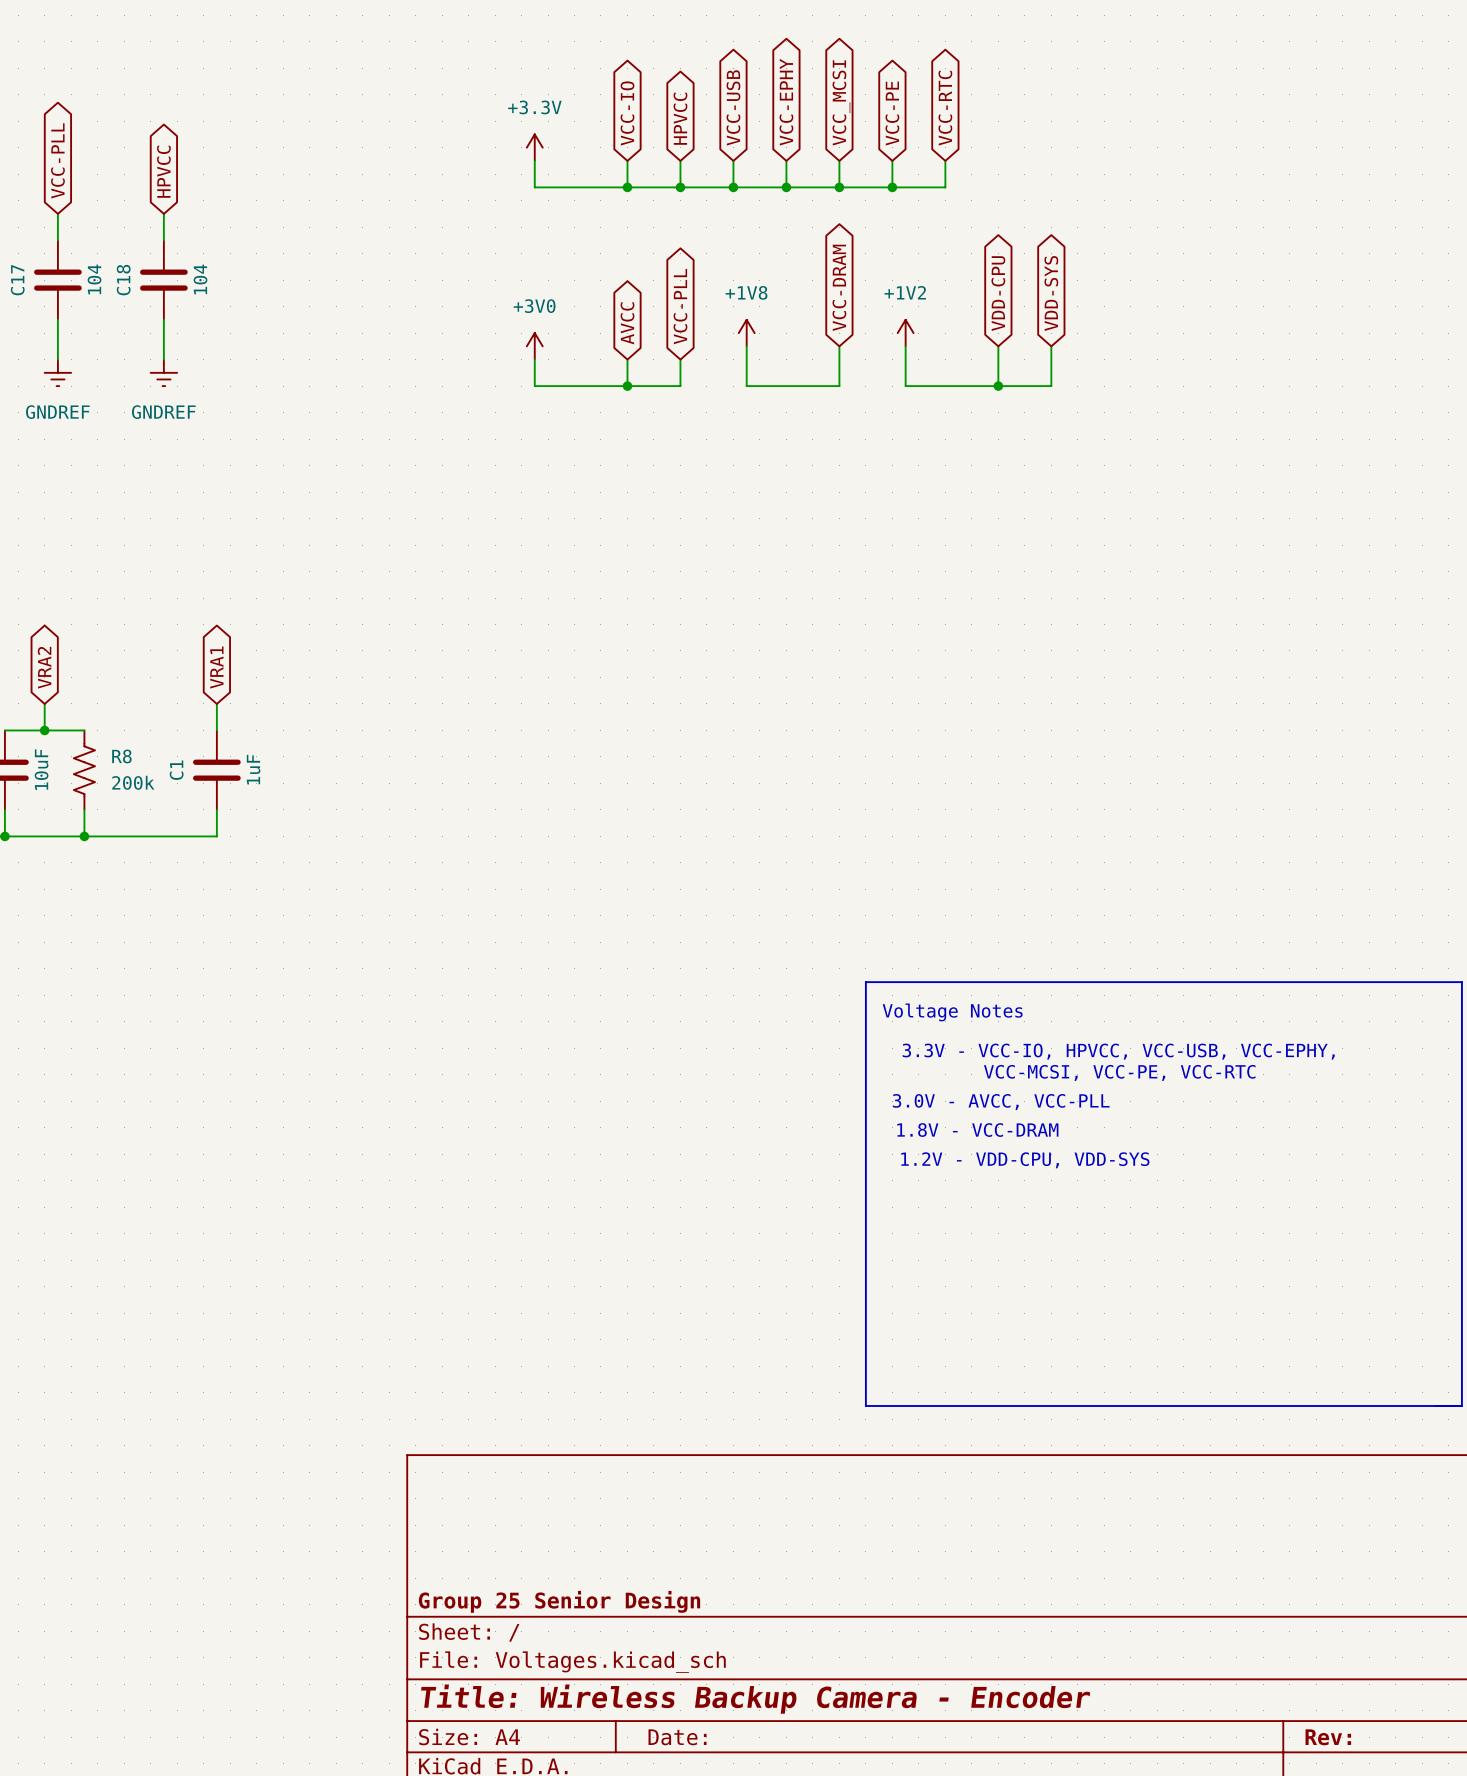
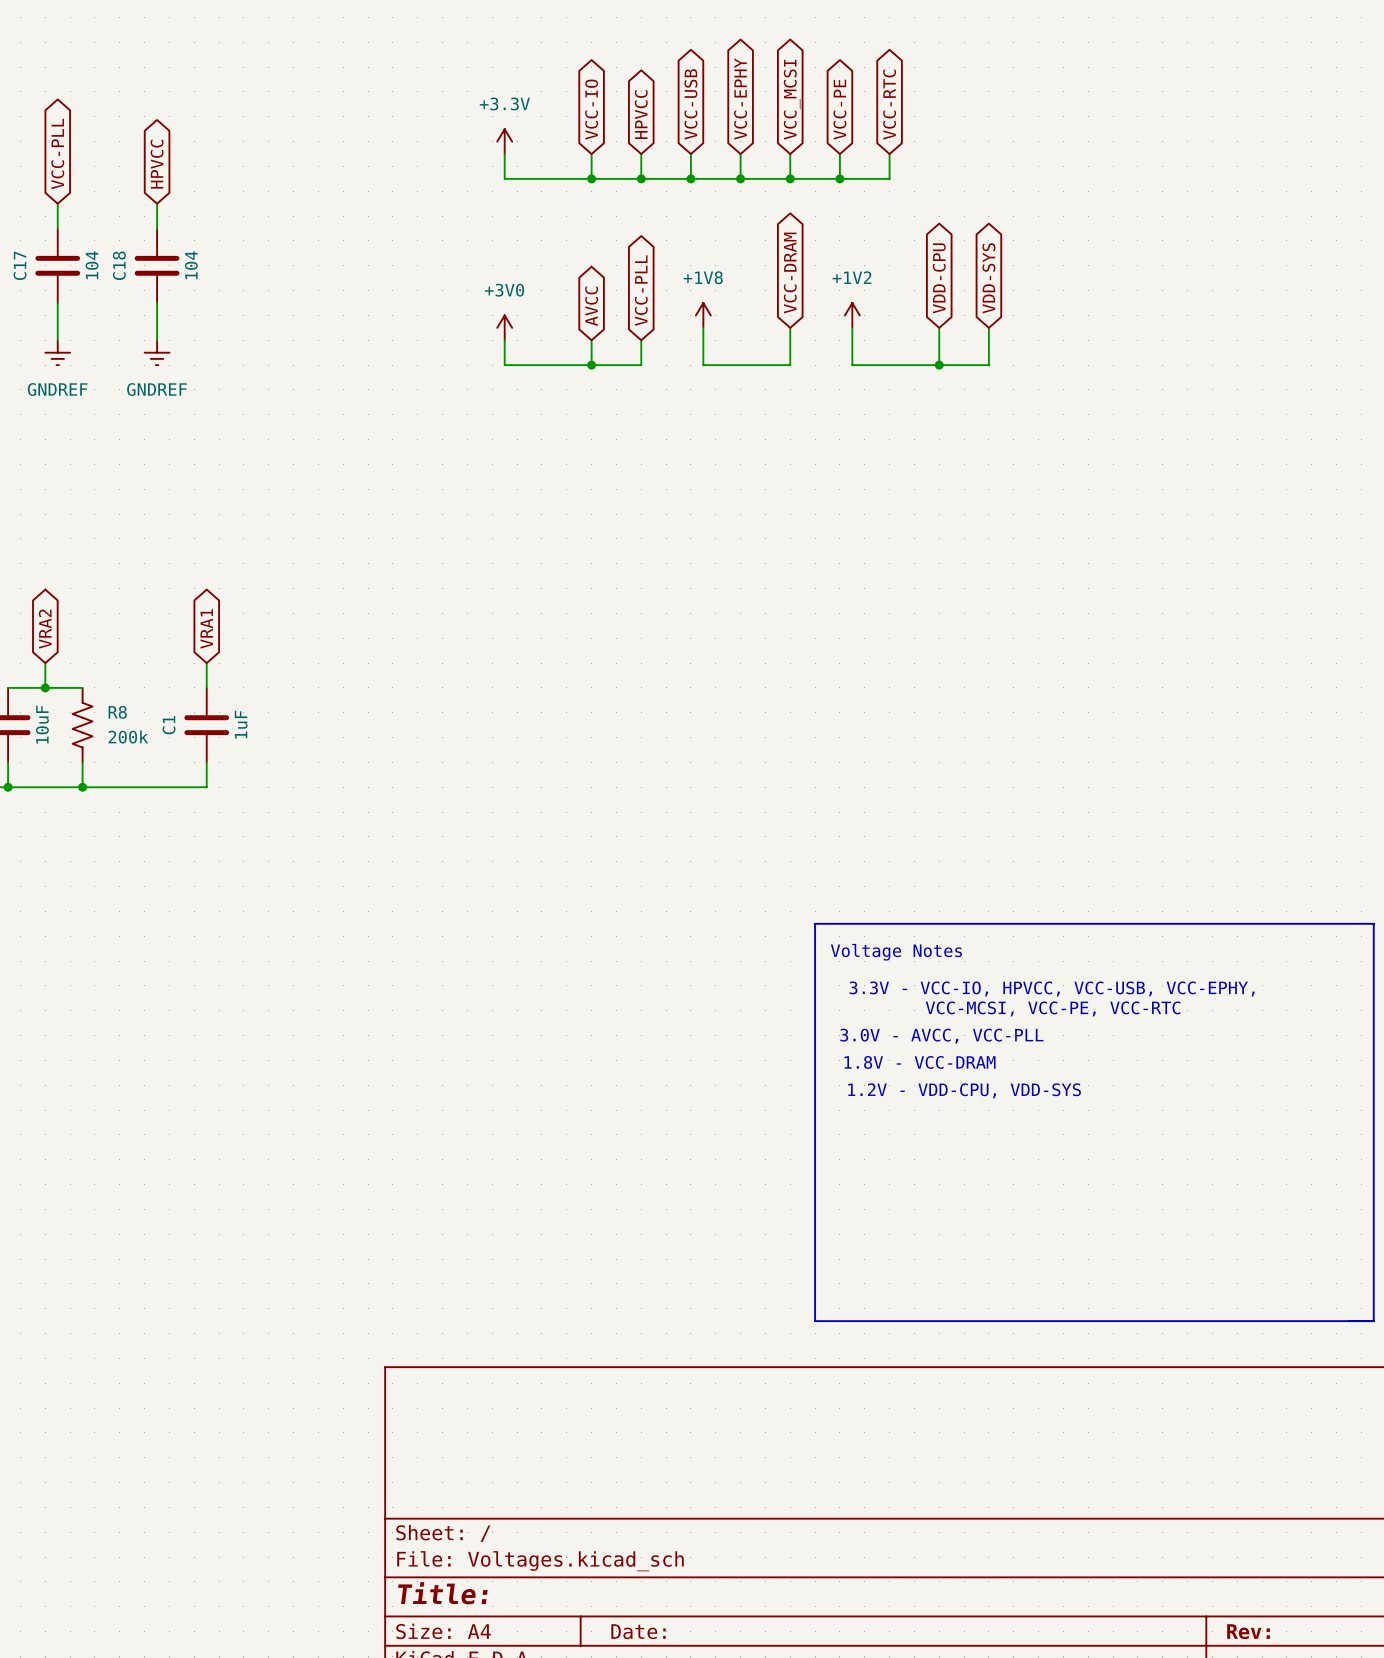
title block: Group 25 Senior Design (559, 1601) -> none
title block: Title: Wireless Backup Camera - Encoder (755, 1699) -> Title: (442, 1593)

